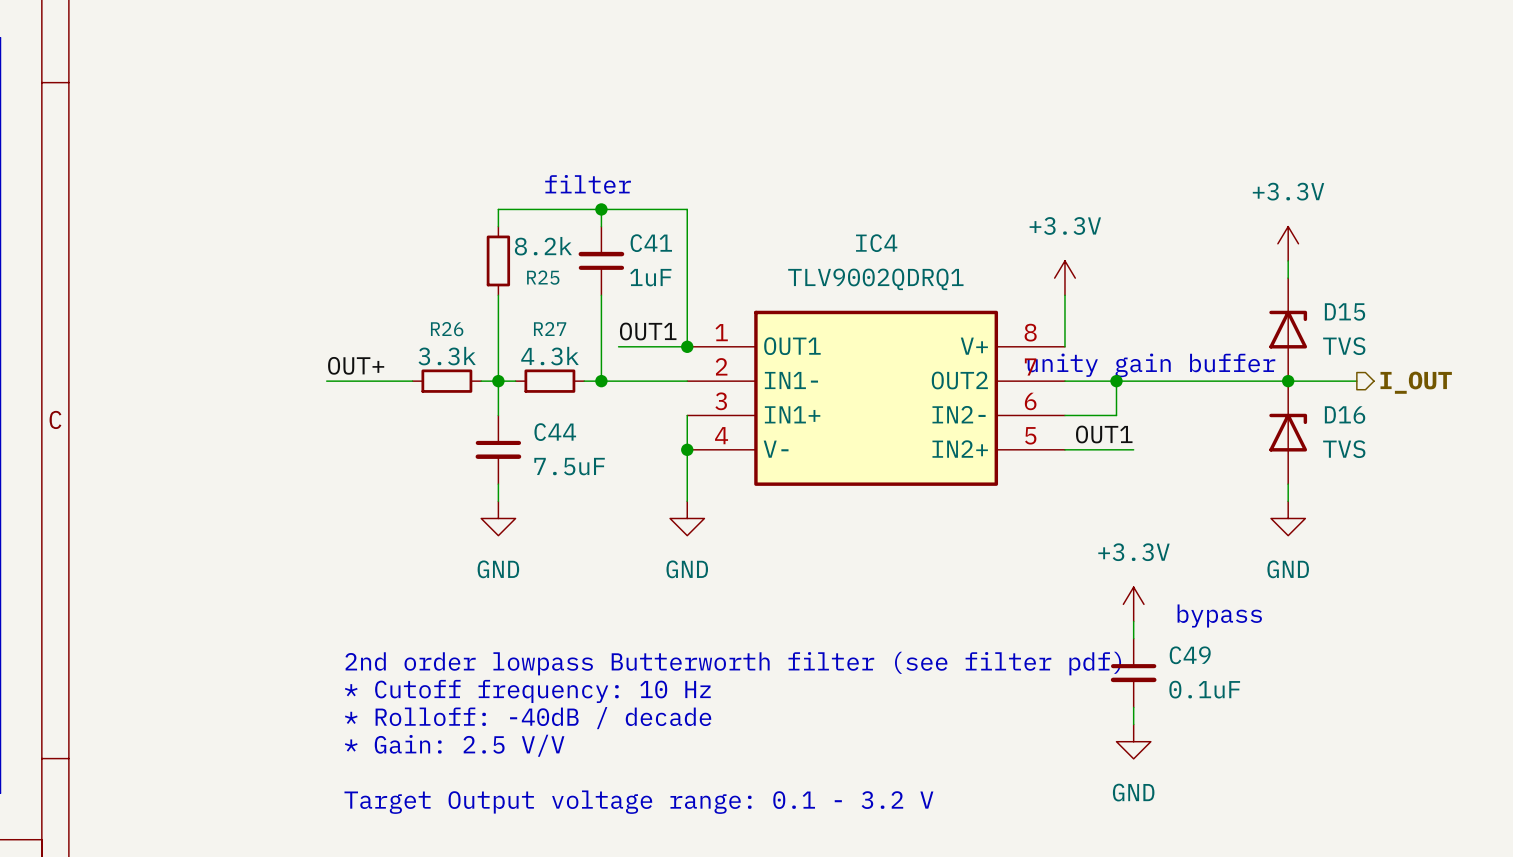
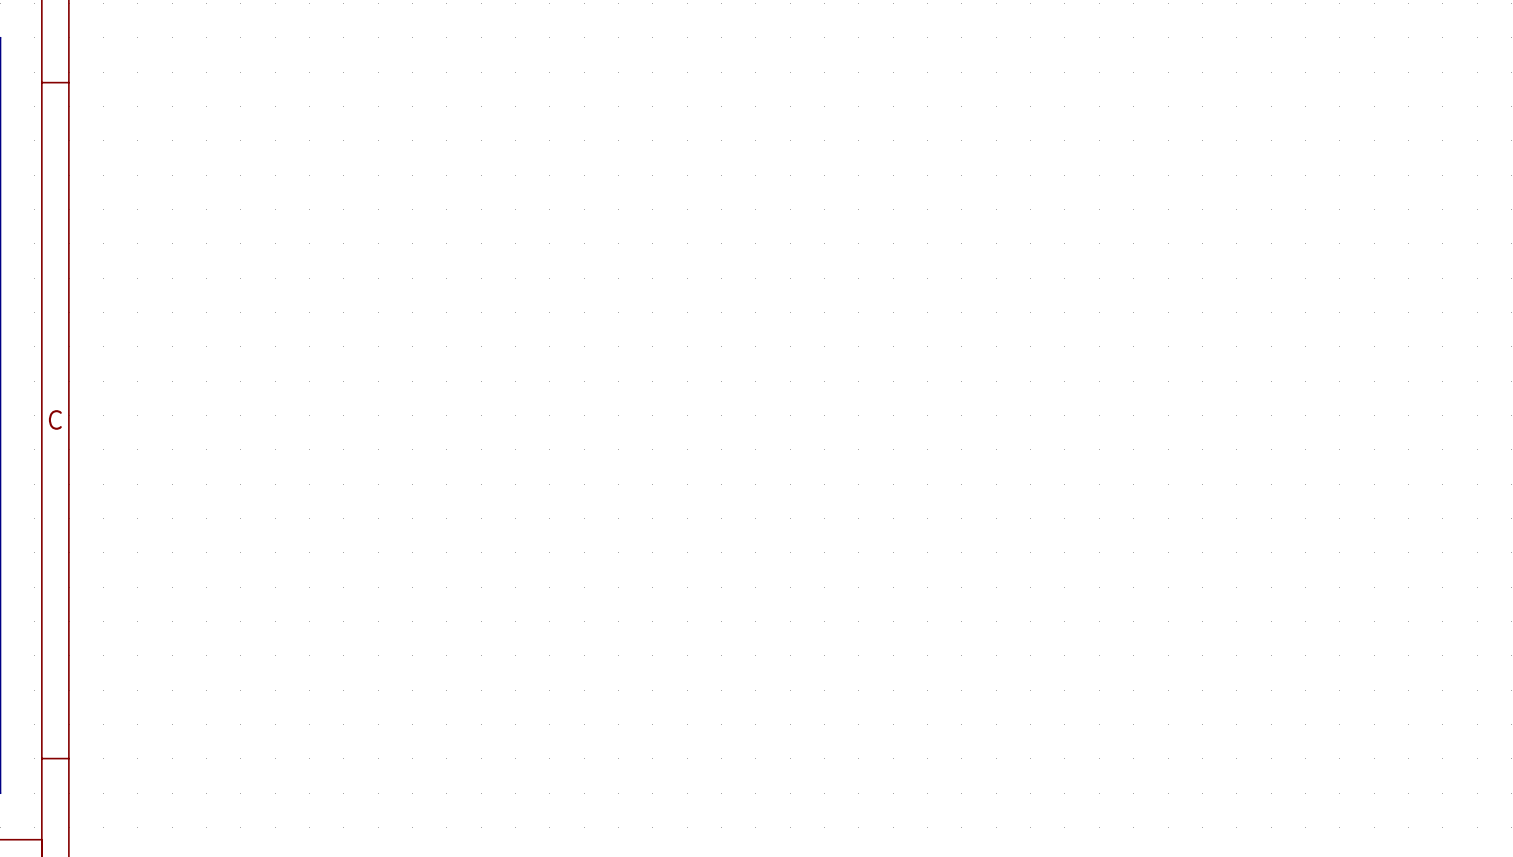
text: filter (588, 184) -> none
wire: (601, 209) (601, 226) -> none
junction: (601, 209) -> none
wire: (498, 226) (498, 209) (687, 209) (687, 346) (618, 346) -> none
power symbol: +3.3V (1288, 243) -> none
R25: 8.2k (498, 260) -> none
C41: 1uF (601, 260) -> none
wire: (1288, 260) (1288, 278) -> none
power symbol: +3.3V (1064, 278) -> none
wire: (498, 295) (498, 415) -> none
wire: (601, 295) (601, 381) -> none
wire: (1064, 295) (1064, 346) -> none
D15: TVS (1288, 329) -> none
label: OUT1 (648, 331) -> none
junction: (687, 346) -> none
label: OUT+ (356, 365) -> none
text: unity gain buffer (1151, 365) -> none
wire: (326, 381) (412, 381) -> none
R26: 3.3k (446, 381) -> none
wire: (481, 381) (515, 381) -> none
junction: (498, 381) -> none
R27: 4.3k (549, 381) -> none
wire: (584, 381) (687, 381) -> none
junction: (601, 381) -> none
wire: (1064, 381) (1356, 381) -> none
wire: (1116, 381) (1116, 415) (1064, 415) -> none
junction: (1116, 381) -> none
junction: (1288, 381) -> none
hierarchical label: I_OUT (1416, 382) -> none
IC4: TLV9002QDRQ1 (876, 398) -> none
wire: (687, 415) (687, 501) -> none
D16: TVS (1288, 432) -> none
label: OUT1 (1104, 434) -> none
C44: 7.5uF (498, 449) -> none
junction: (687, 449) -> none
wire: (1064, 449) (1133, 449) -> none
wire: (498, 484) (498, 501) -> none
wire: (1288, 484) (1288, 501) -> none
power symbol: GND (498, 518) -> none
power symbol: GND (687, 518) -> none
power symbol: GND (1288, 518) -> none
power symbol: +3.3V (1133, 604) -> none
text: bypass (1219, 616) -> none
wire: (1133, 621) (1133, 638) -> none
text: 2nd order lowpass Butterworth filter (see filter pdf) (733, 663) -> none
C49: 0.1uF (1133, 673) -> none
text: * Cutoff frequency: 10 Hz (527, 691) -> none
wire: (1133, 707) (1133, 724) -> none
text: * Rolloff: -40dB / decade (528, 718) -> none
power symbol: GND (1133, 741) -> none
text: * Gain: 2.5 V/V (454, 745) -> none
text: Target Output voltage range: 0.1 - 3.2 V (638, 802) -> none

